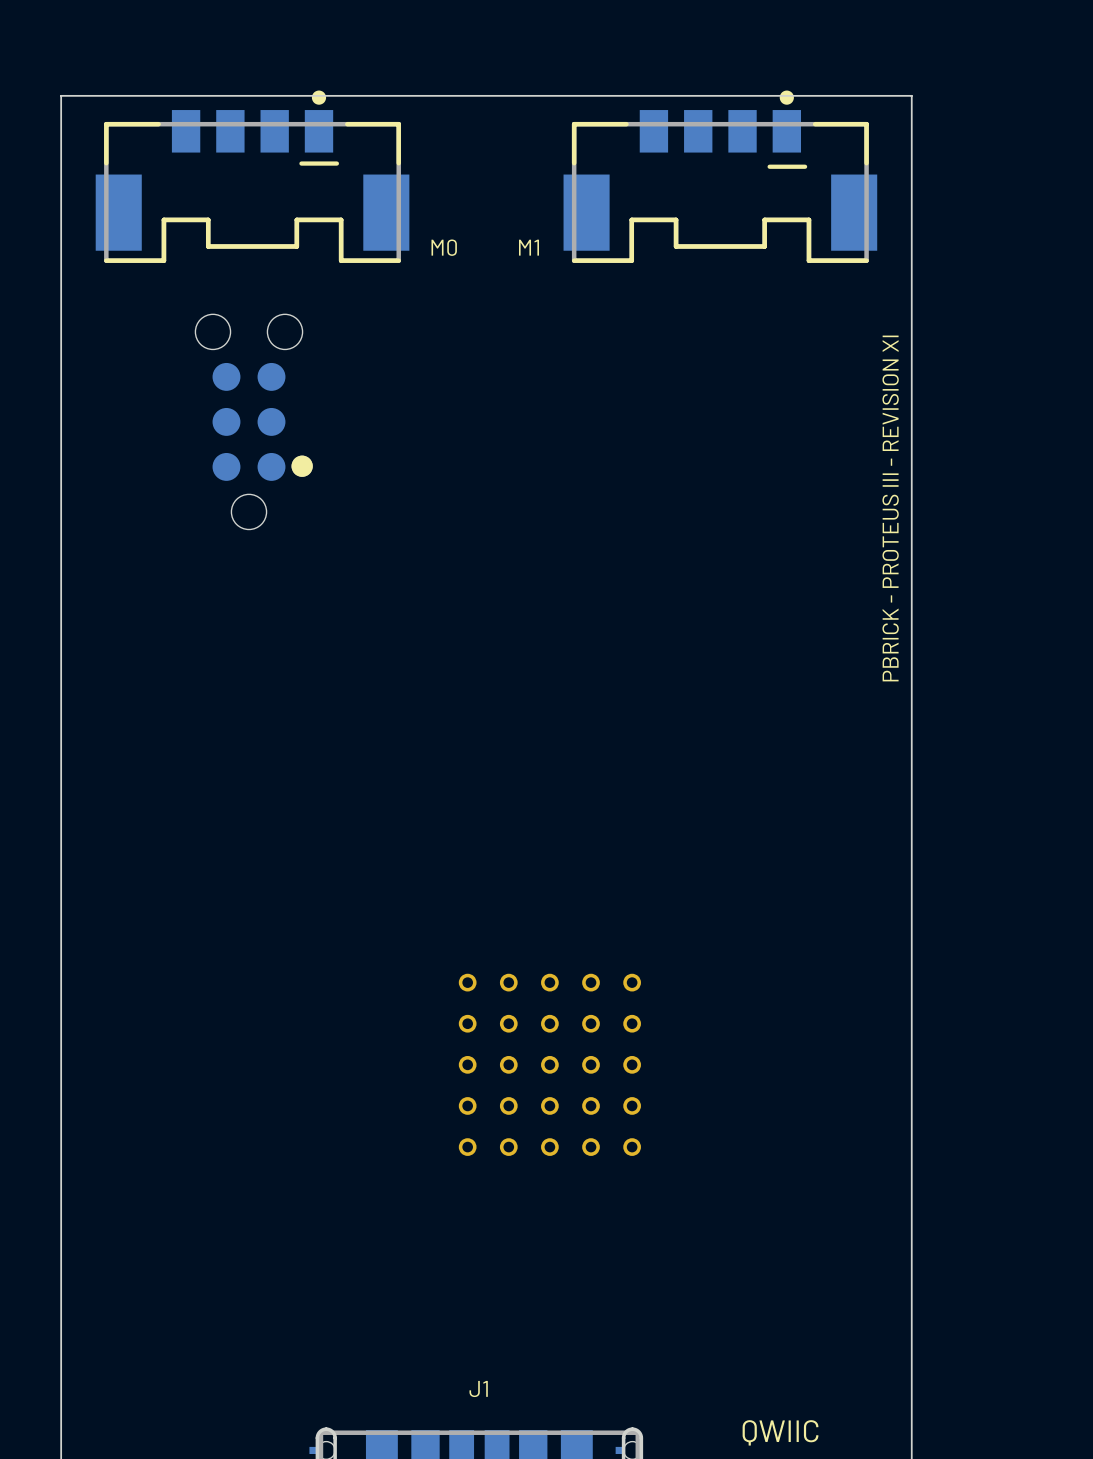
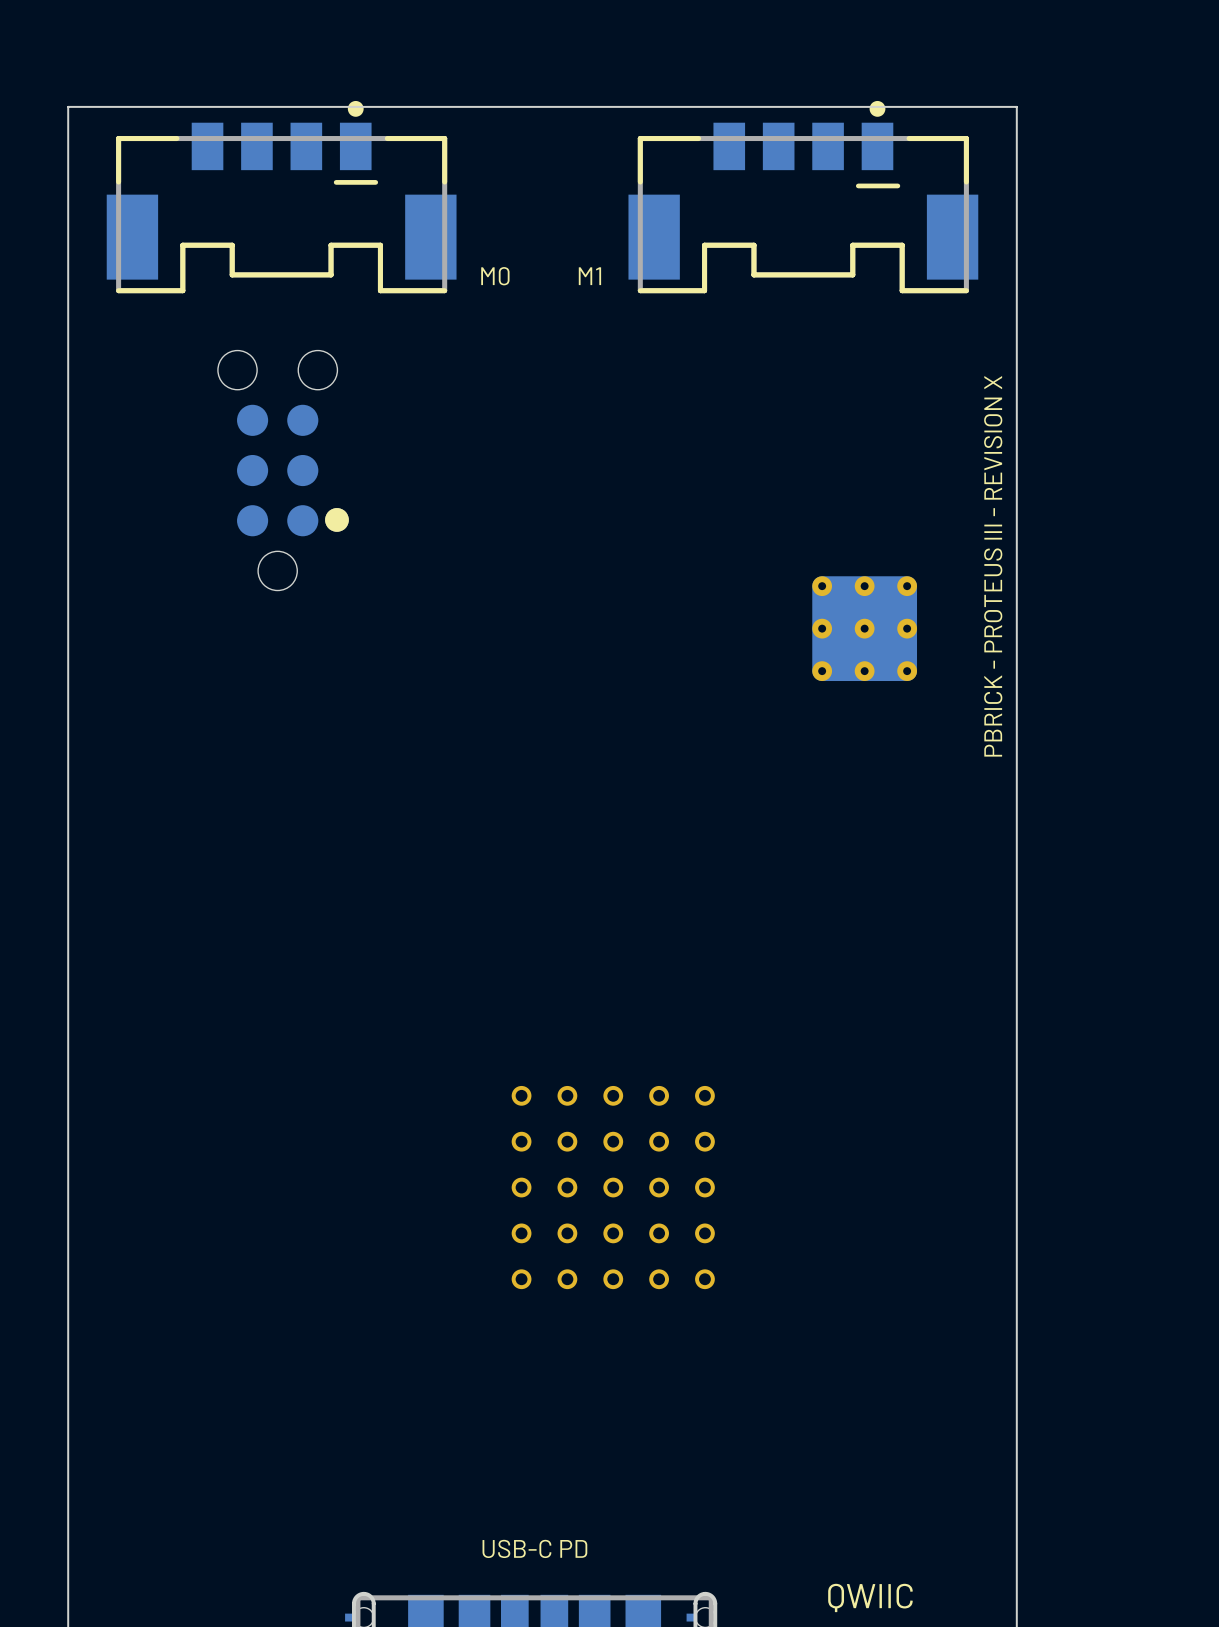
text: PBRICK - PROTEUS III - REVISION XI (890, 508) -> PBRICK - PROTEUS III - REVISION X (993, 566)
part: none -> (864, 628)
J1 name: J1 (478, 1388) -> USB-C PD (534, 1548)

